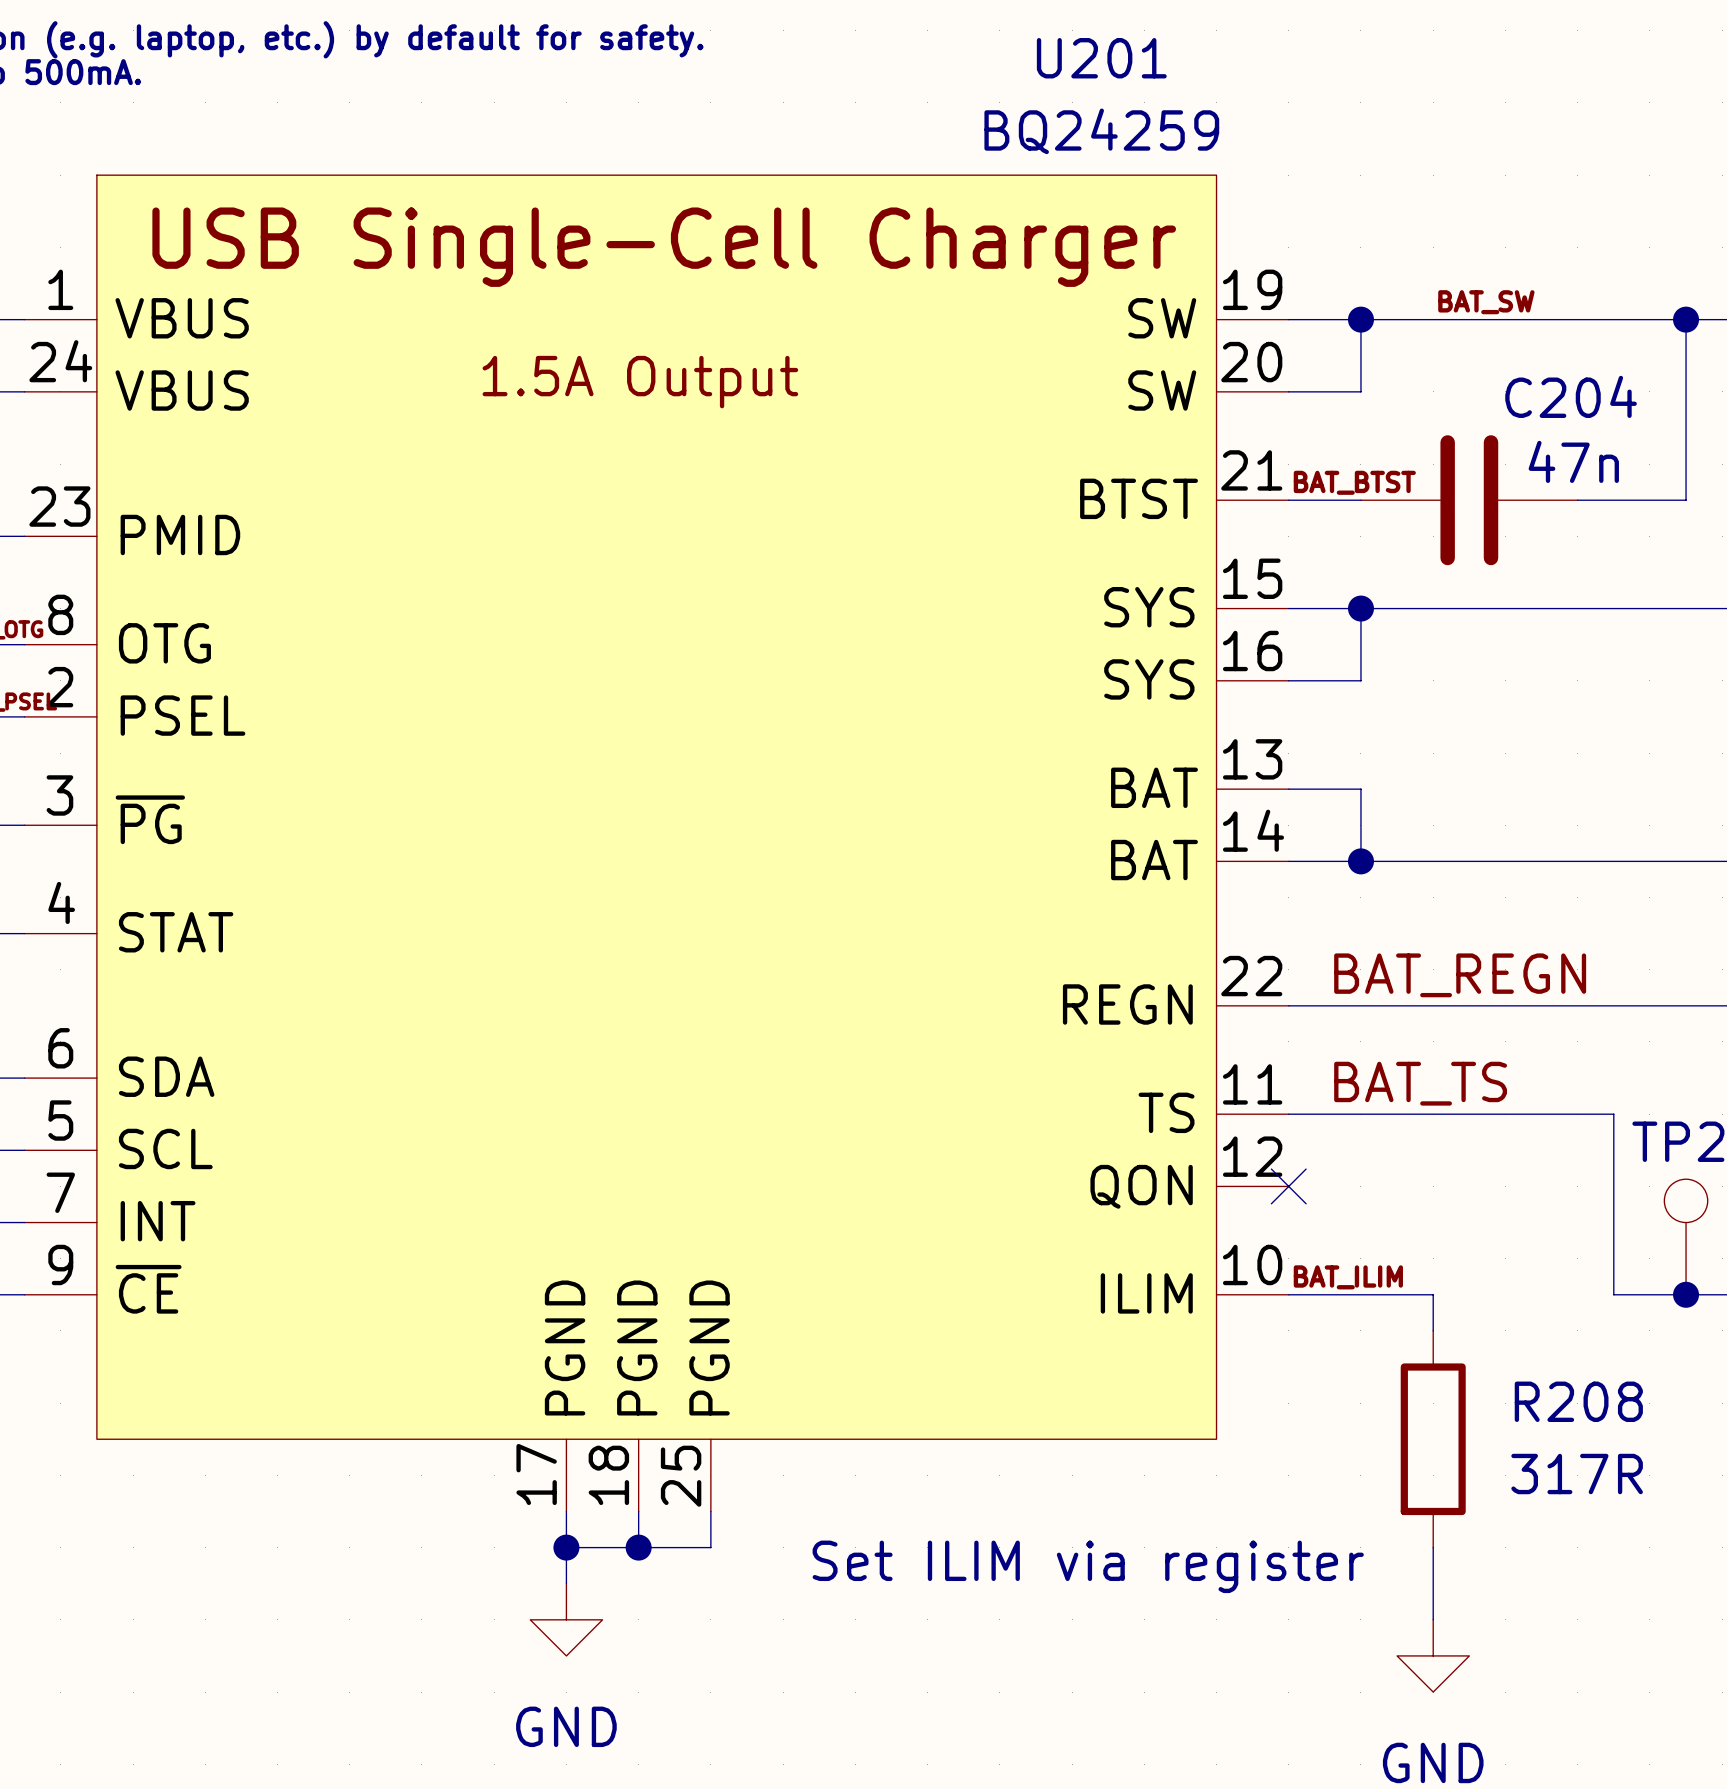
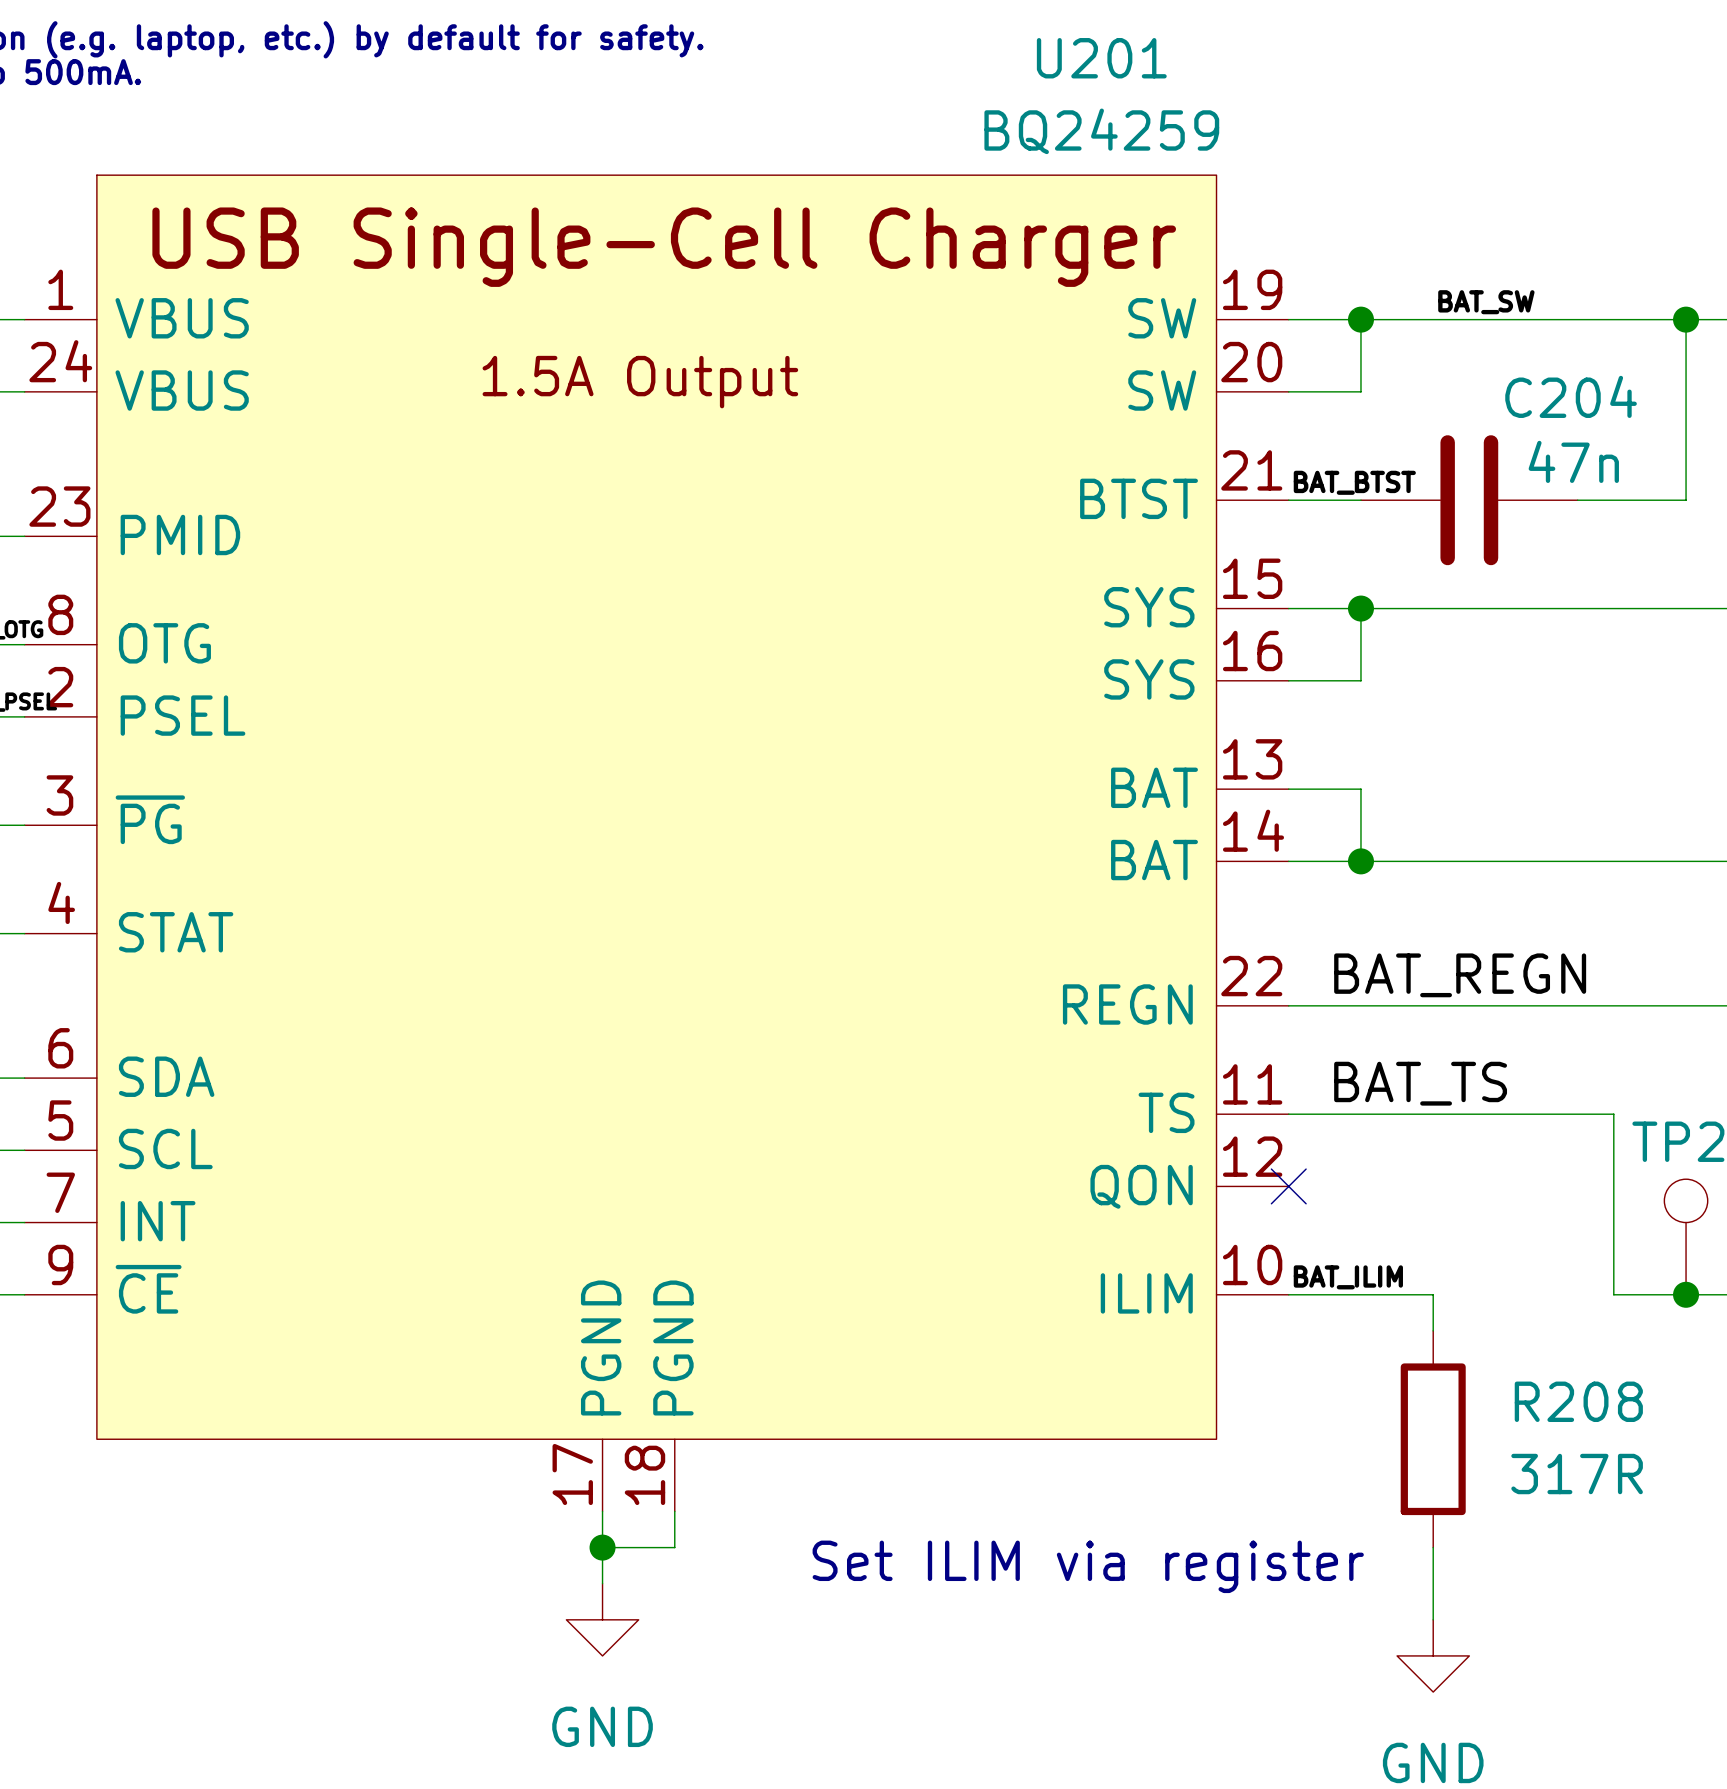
U201 symbol: [24, 175, 1289, 1512] -> [24, 175, 1289, 1512]
wire: (566, 1511) (566, 1583) -> (602, 1511) (602, 1583)
wire: (638, 1511) (638, 1547) -> none
wire: (710, 1511) (710, 1547) (674, 1547) -> (674, 1511) (674, 1547)
wire: (566, 1547) (602, 1547) -> none
junction: (566, 1547) -> none
junction: none -> (602, 1547)
junction: (638, 1547) -> none
power symbol position: GND (566, 1619) -> GND (602, 1619)

